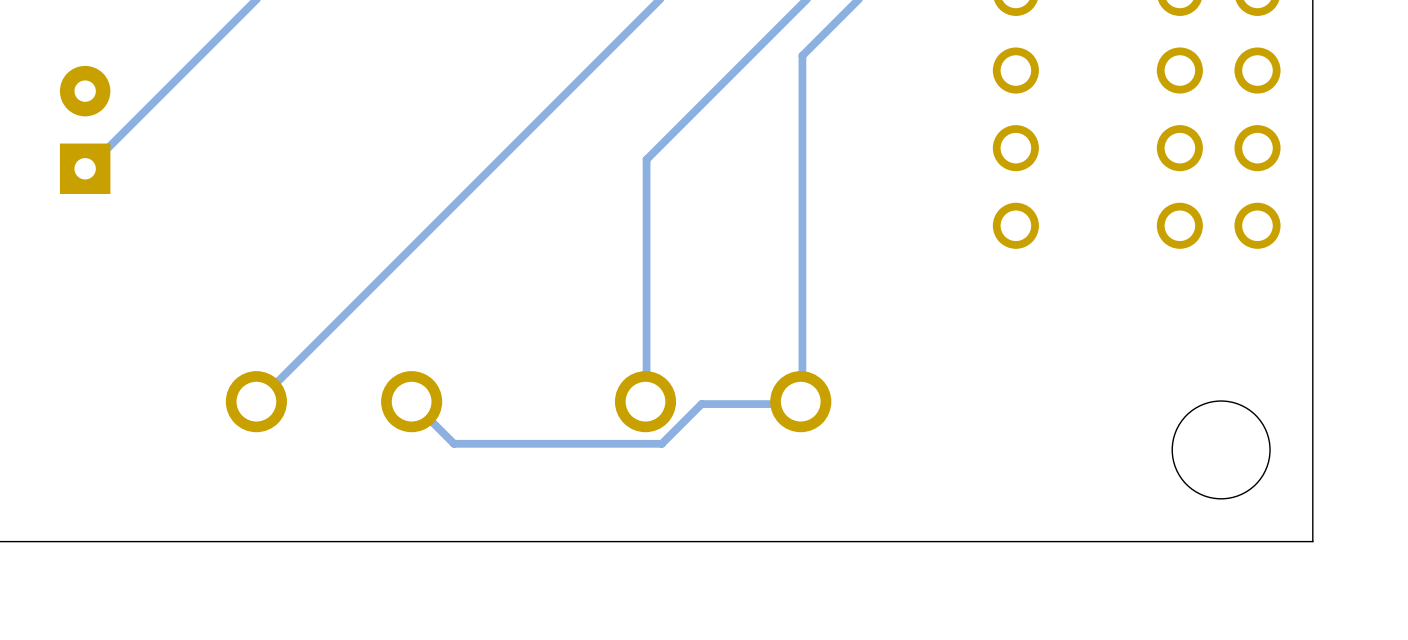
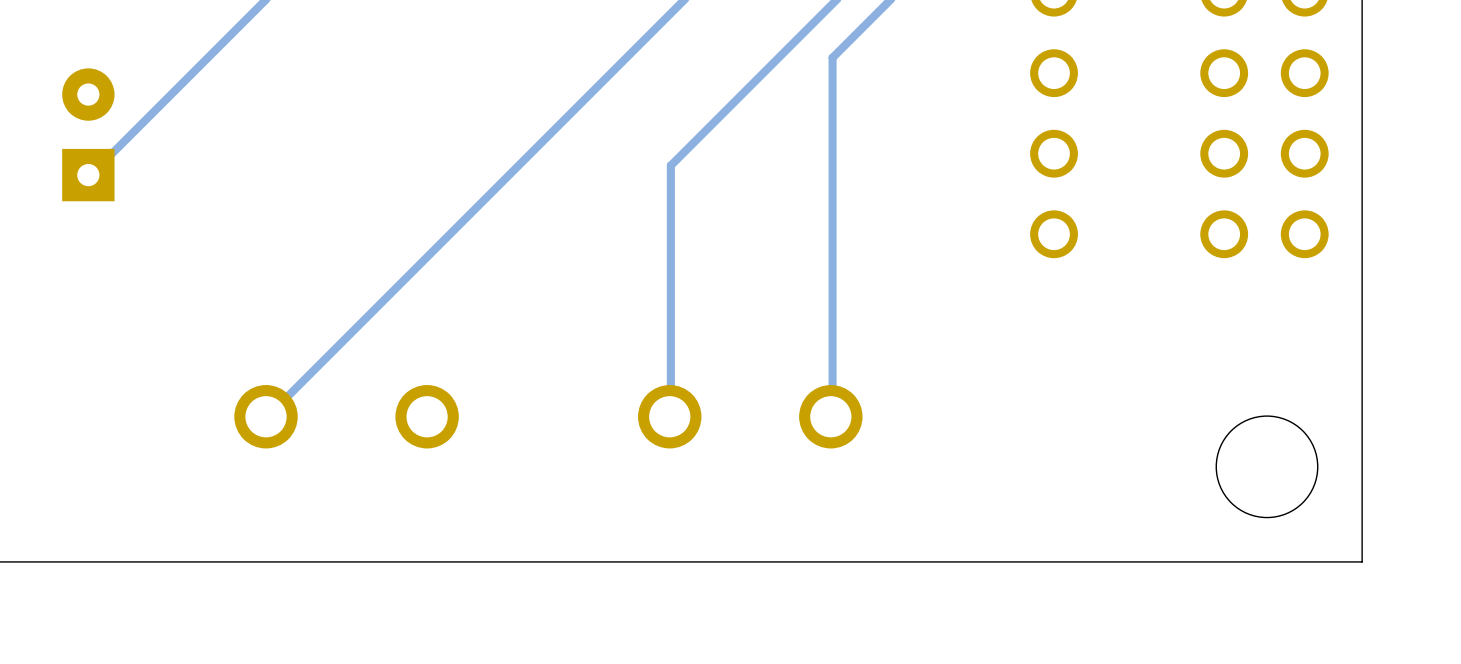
track: (800, 401) (799, 404) (701, 404) (661, 443) (454, 443) (411, 401) -> none

